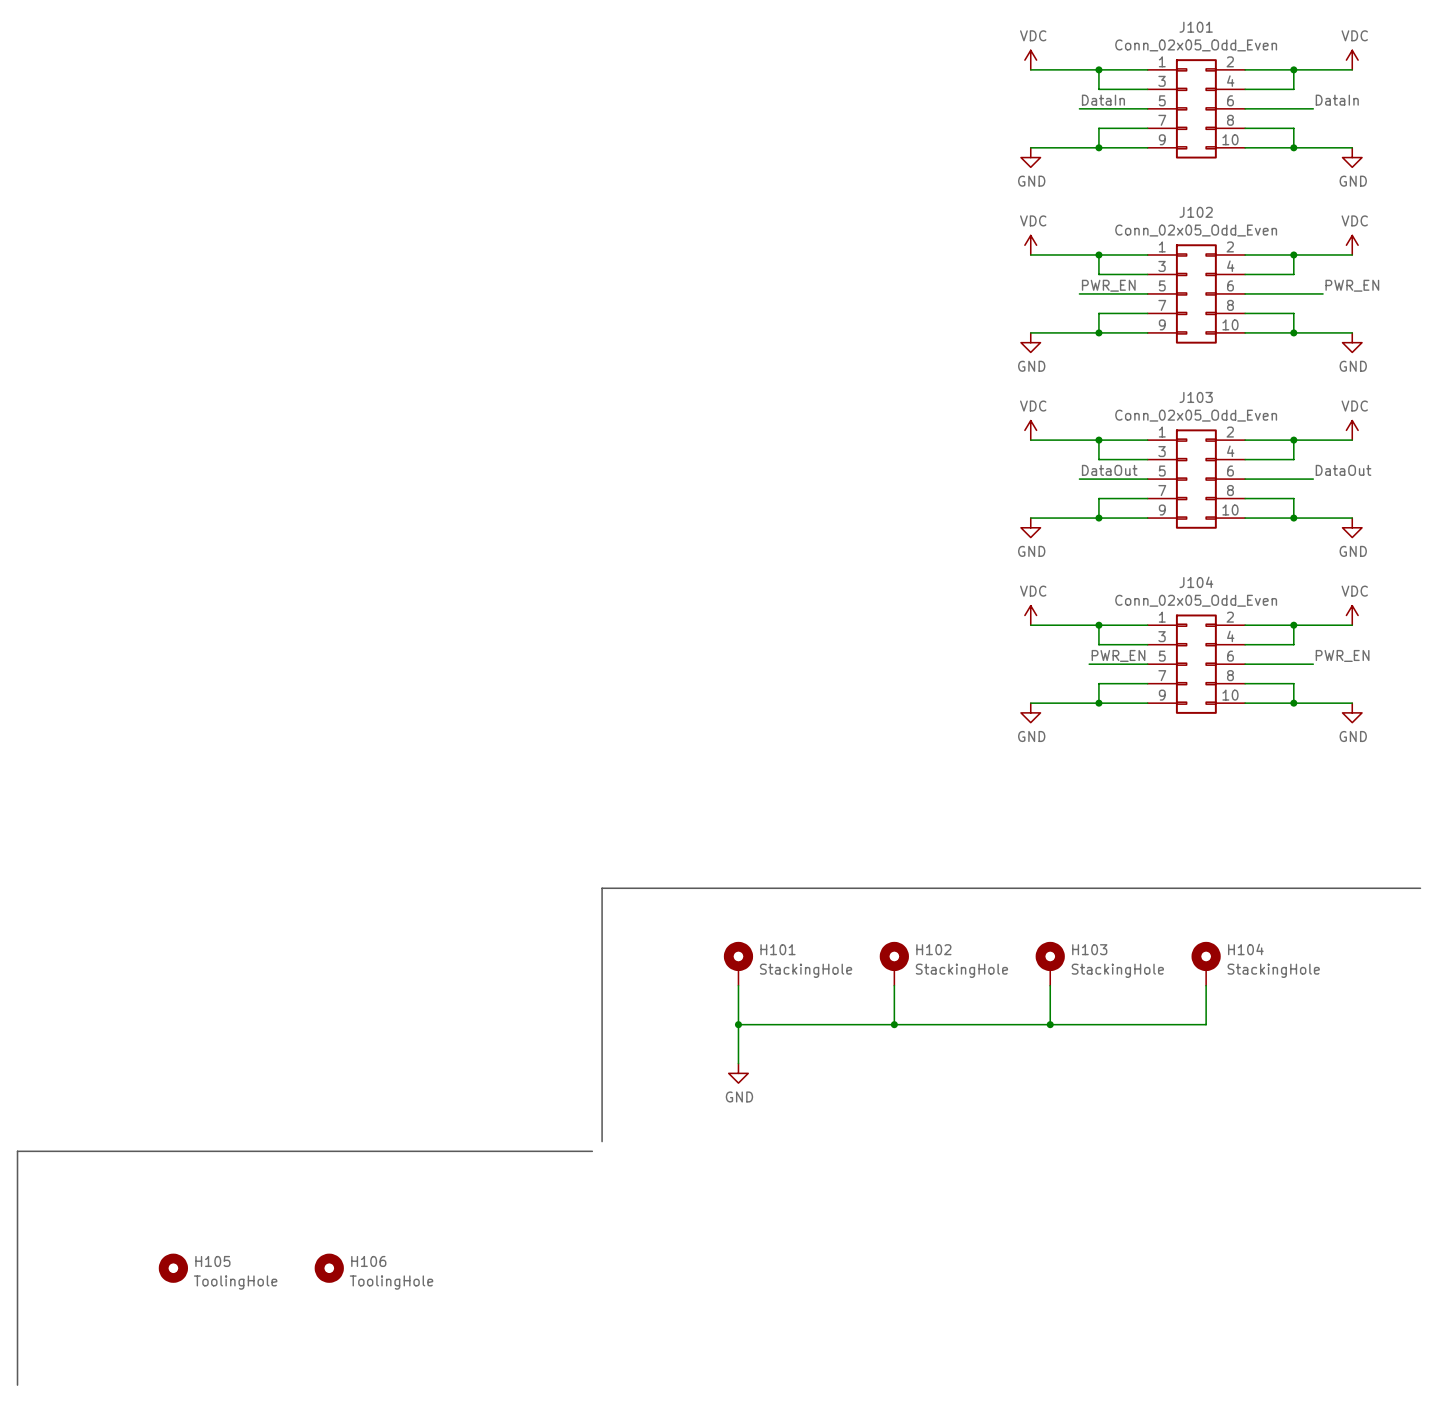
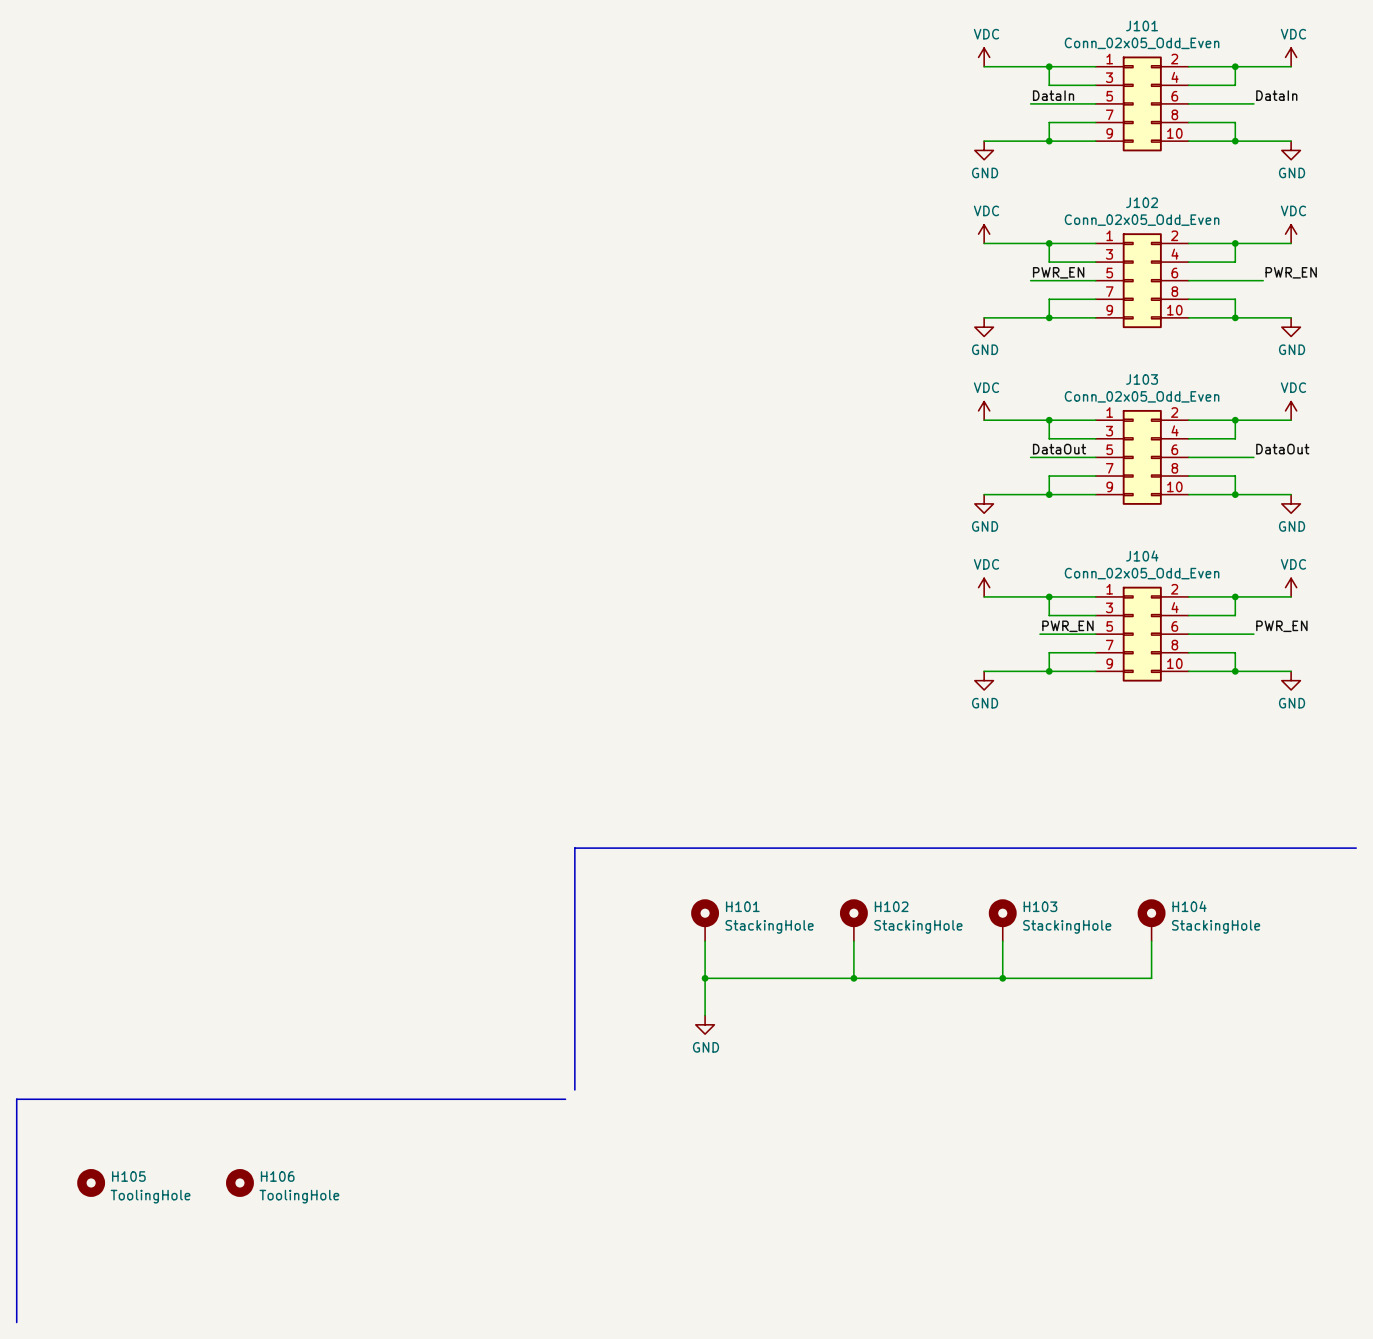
H105 position: (173, 1268) -> (91, 1182)
H106 position: (329, 1268) -> (239, 1182)

